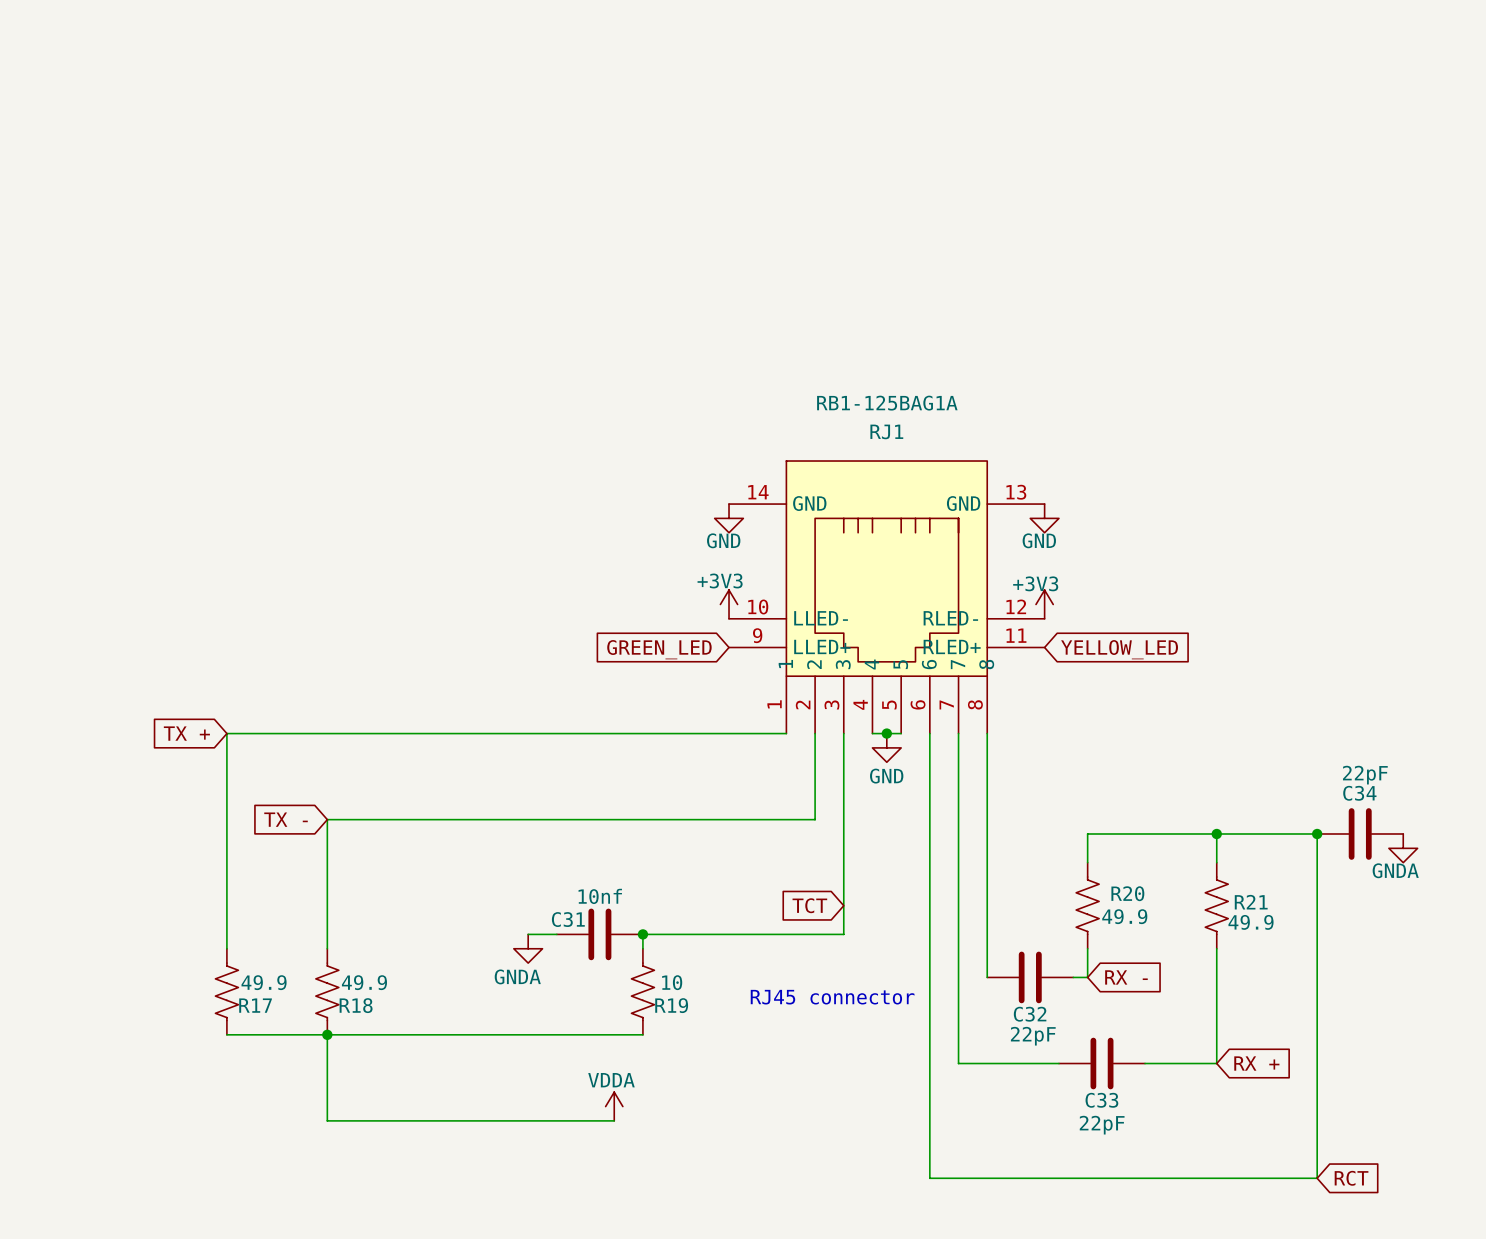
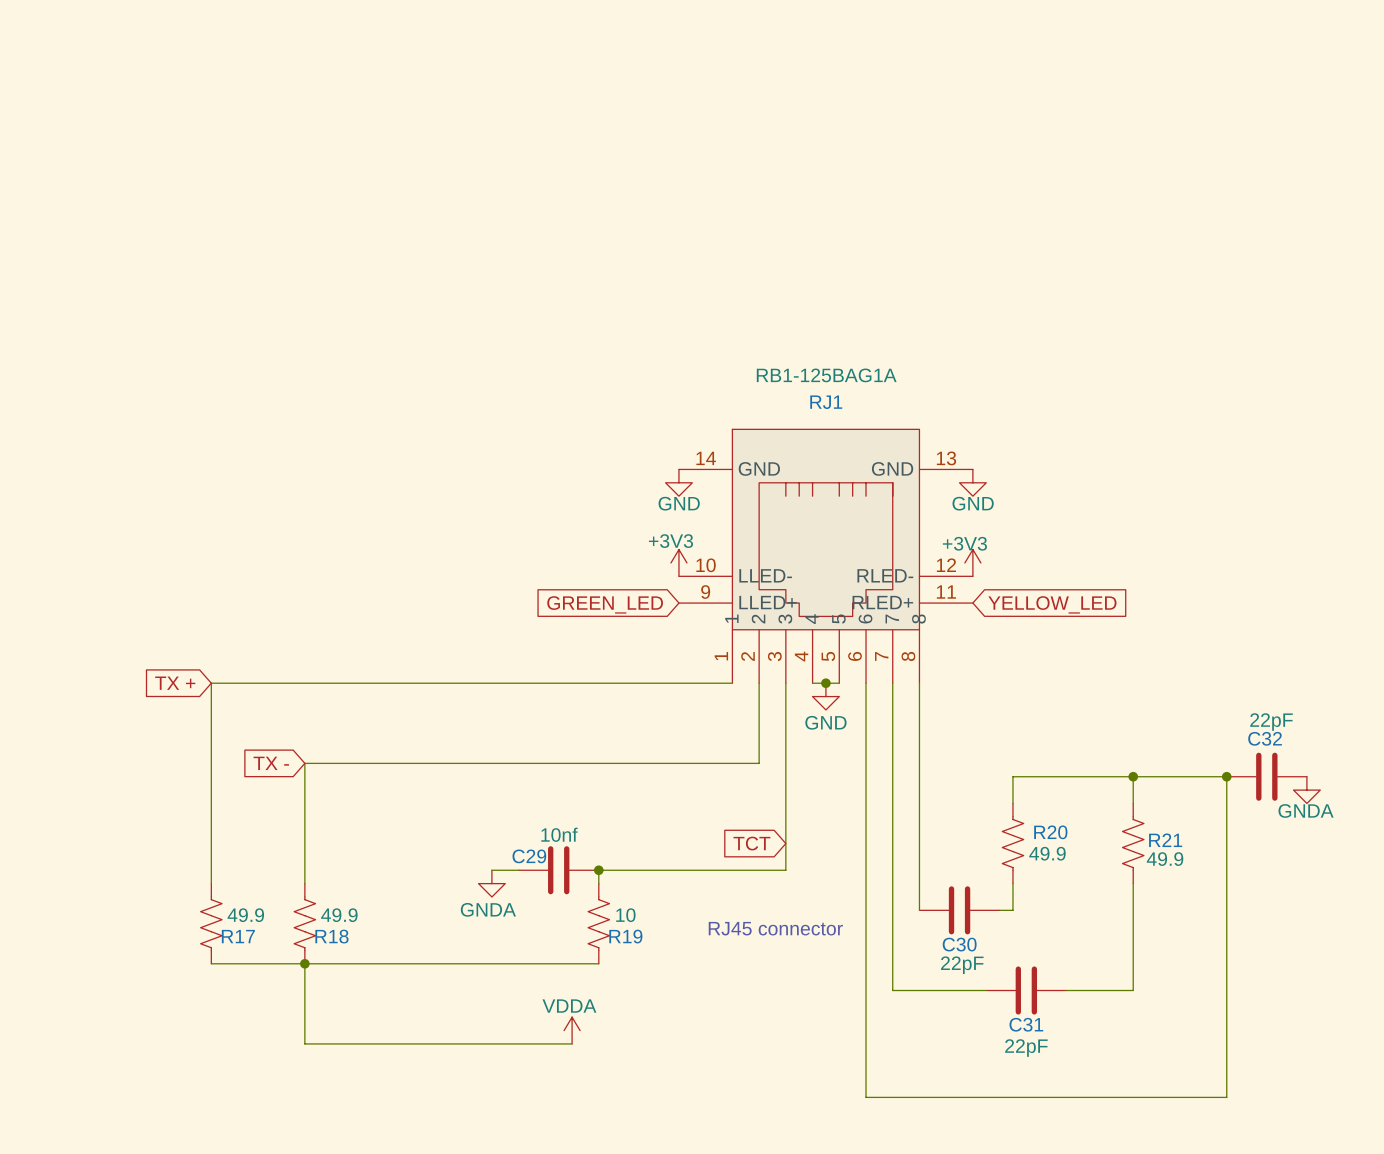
C34 name: C34 (1359, 793) -> C32 (1265, 738)
C31 name: C31 (568, 919) -> C29 (529, 856)
global label: RX - (1126, 977) -> none
C32 name: C32 (1030, 1014) -> C30 (959, 944)
global label: RX + (1256, 1063) -> none
C33 name: C33 (1101, 1100) -> C31 (1026, 1024)
global label: RCT (1351, 1178) -> none

